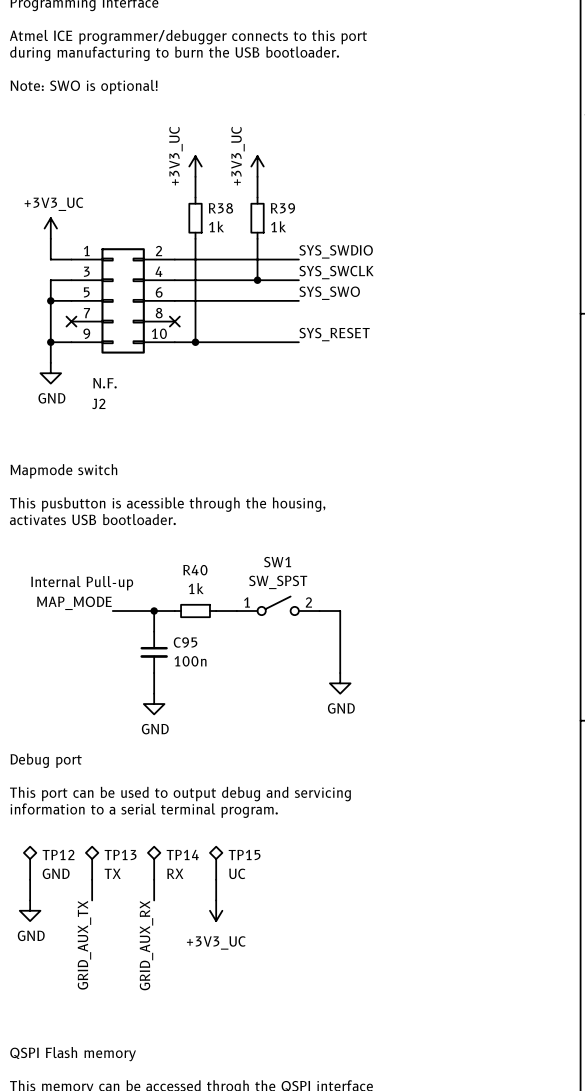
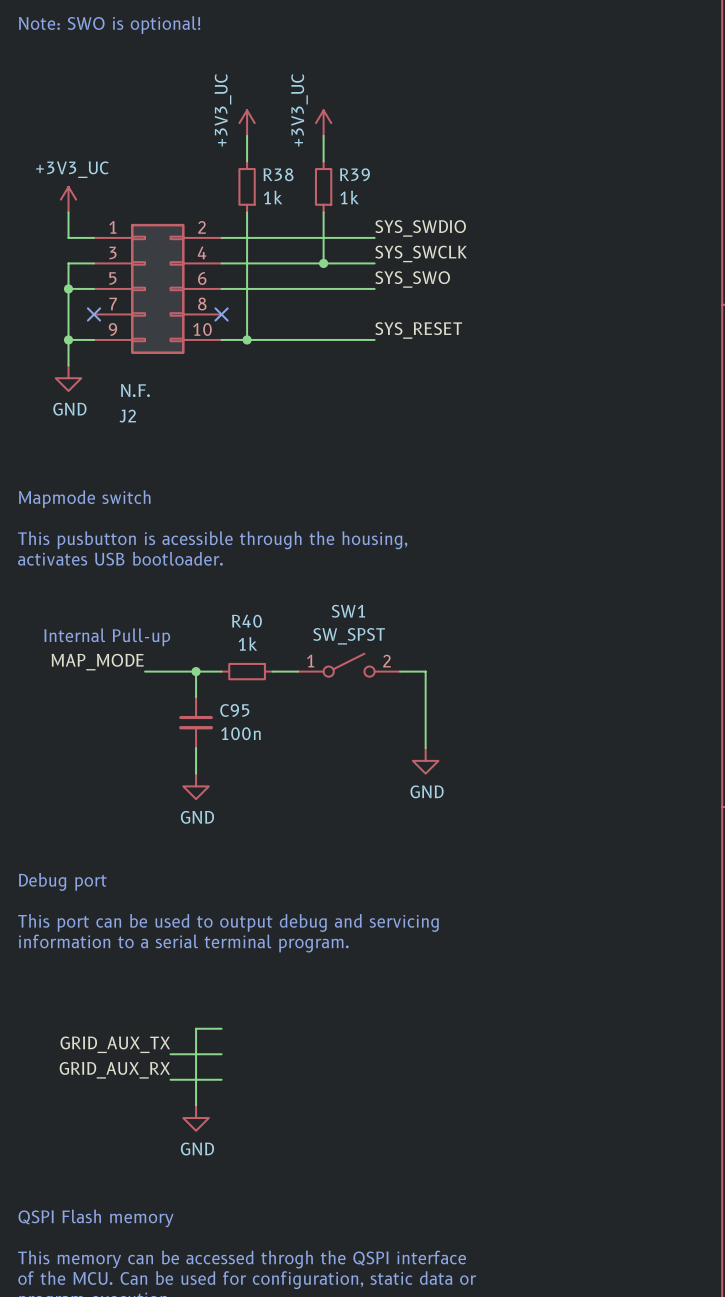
text position: Debug port (46, 760) -> Debug port (62, 881)
text position: This port can be used to output debug and servicing (180, 794) -> This port can be used to output debug and servicing (228, 922)
text position: information to a serial terminal program. (144, 810) -> information to a serial terminal program. (183, 943)
TP12: GND (30, 863) -> none
TP13: TX (92, 863) -> none
TP14: RX (154, 863) -> none
TP15: UC (216, 863) -> none
wire: (30, 879) (30, 900) -> none
wire: (92, 879) (92, 900) -> none
wire: (154, 879) (154, 900) -> none
wire: (216, 879) (216, 900) -> none
wire: none -> (221, 1028) (196, 1028) (196, 1105)
power symbol position: GND (30, 910) -> GND (196, 1118)
power symbol: +3V3_UC (216, 910) -> none
wire: none -> (170, 1054) (221, 1054)
wire: none -> (170, 1079) (221, 1079)
label rotation: 0° (84, 945) -> 90° clockwise (115, 1044)
label rotation: 0° (146, 945) -> 90° clockwise (114, 1070)

